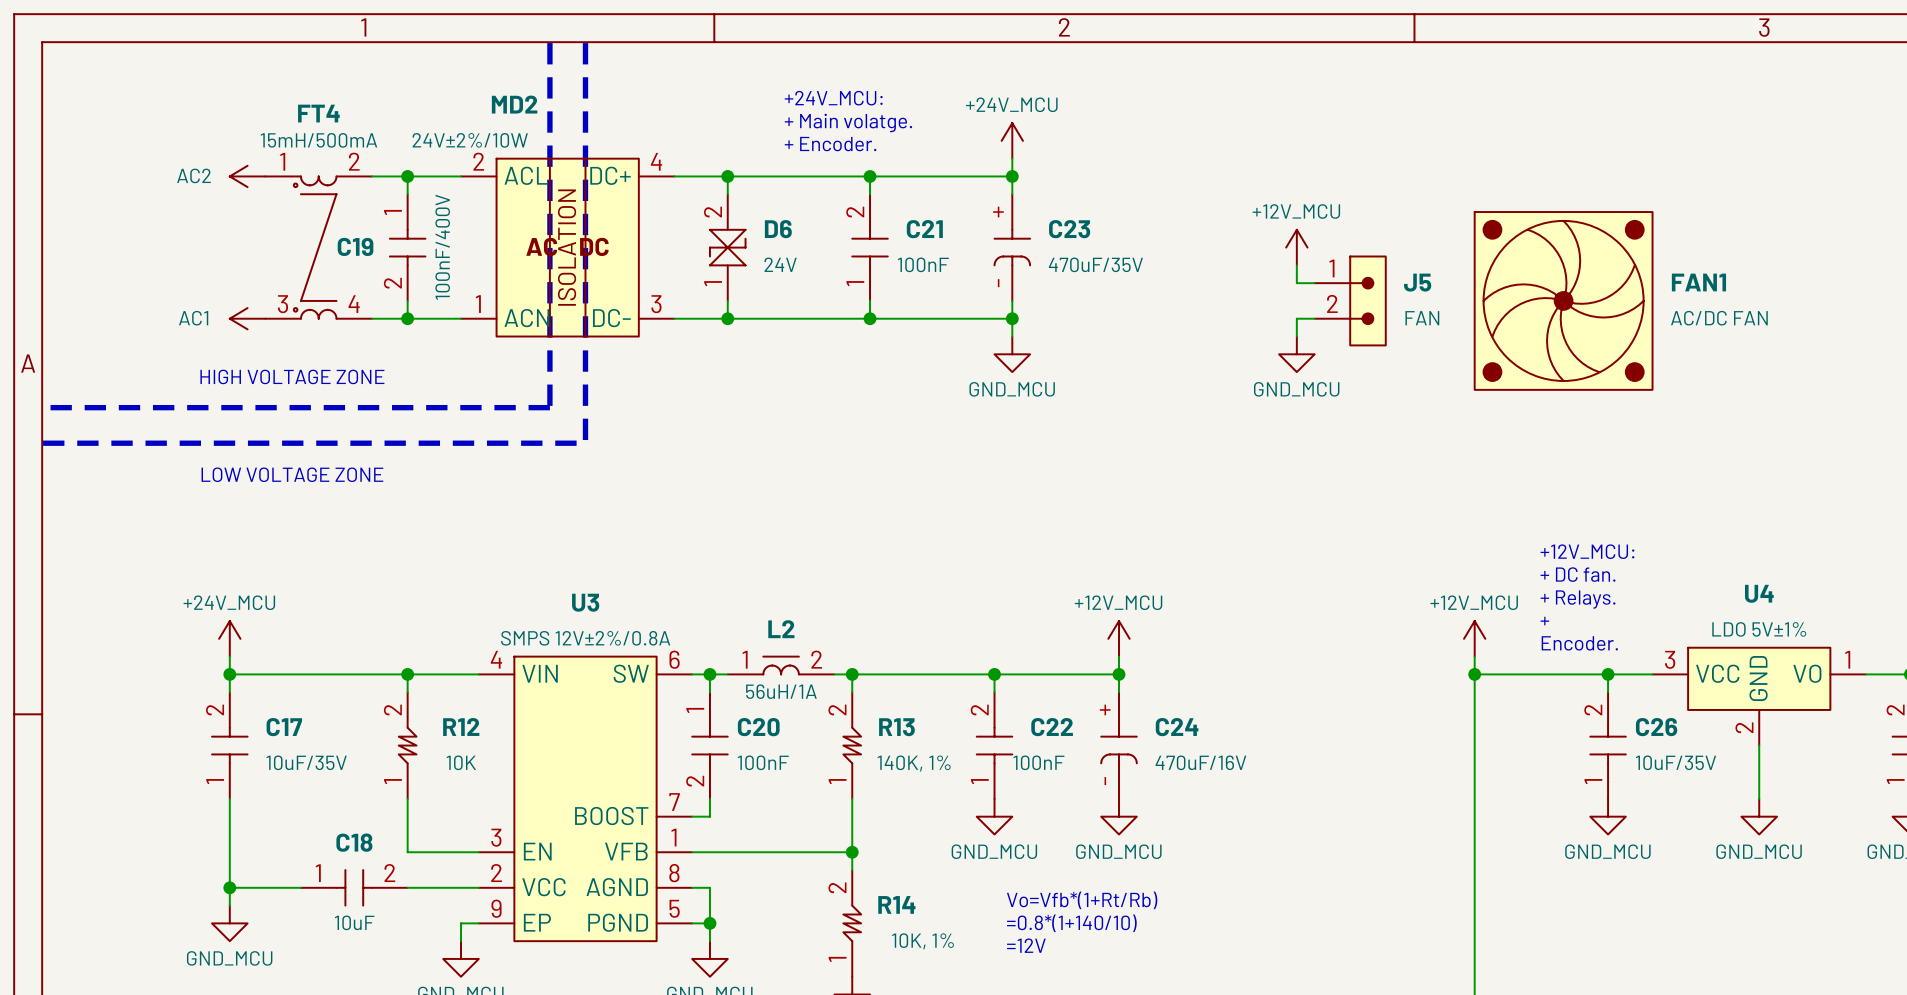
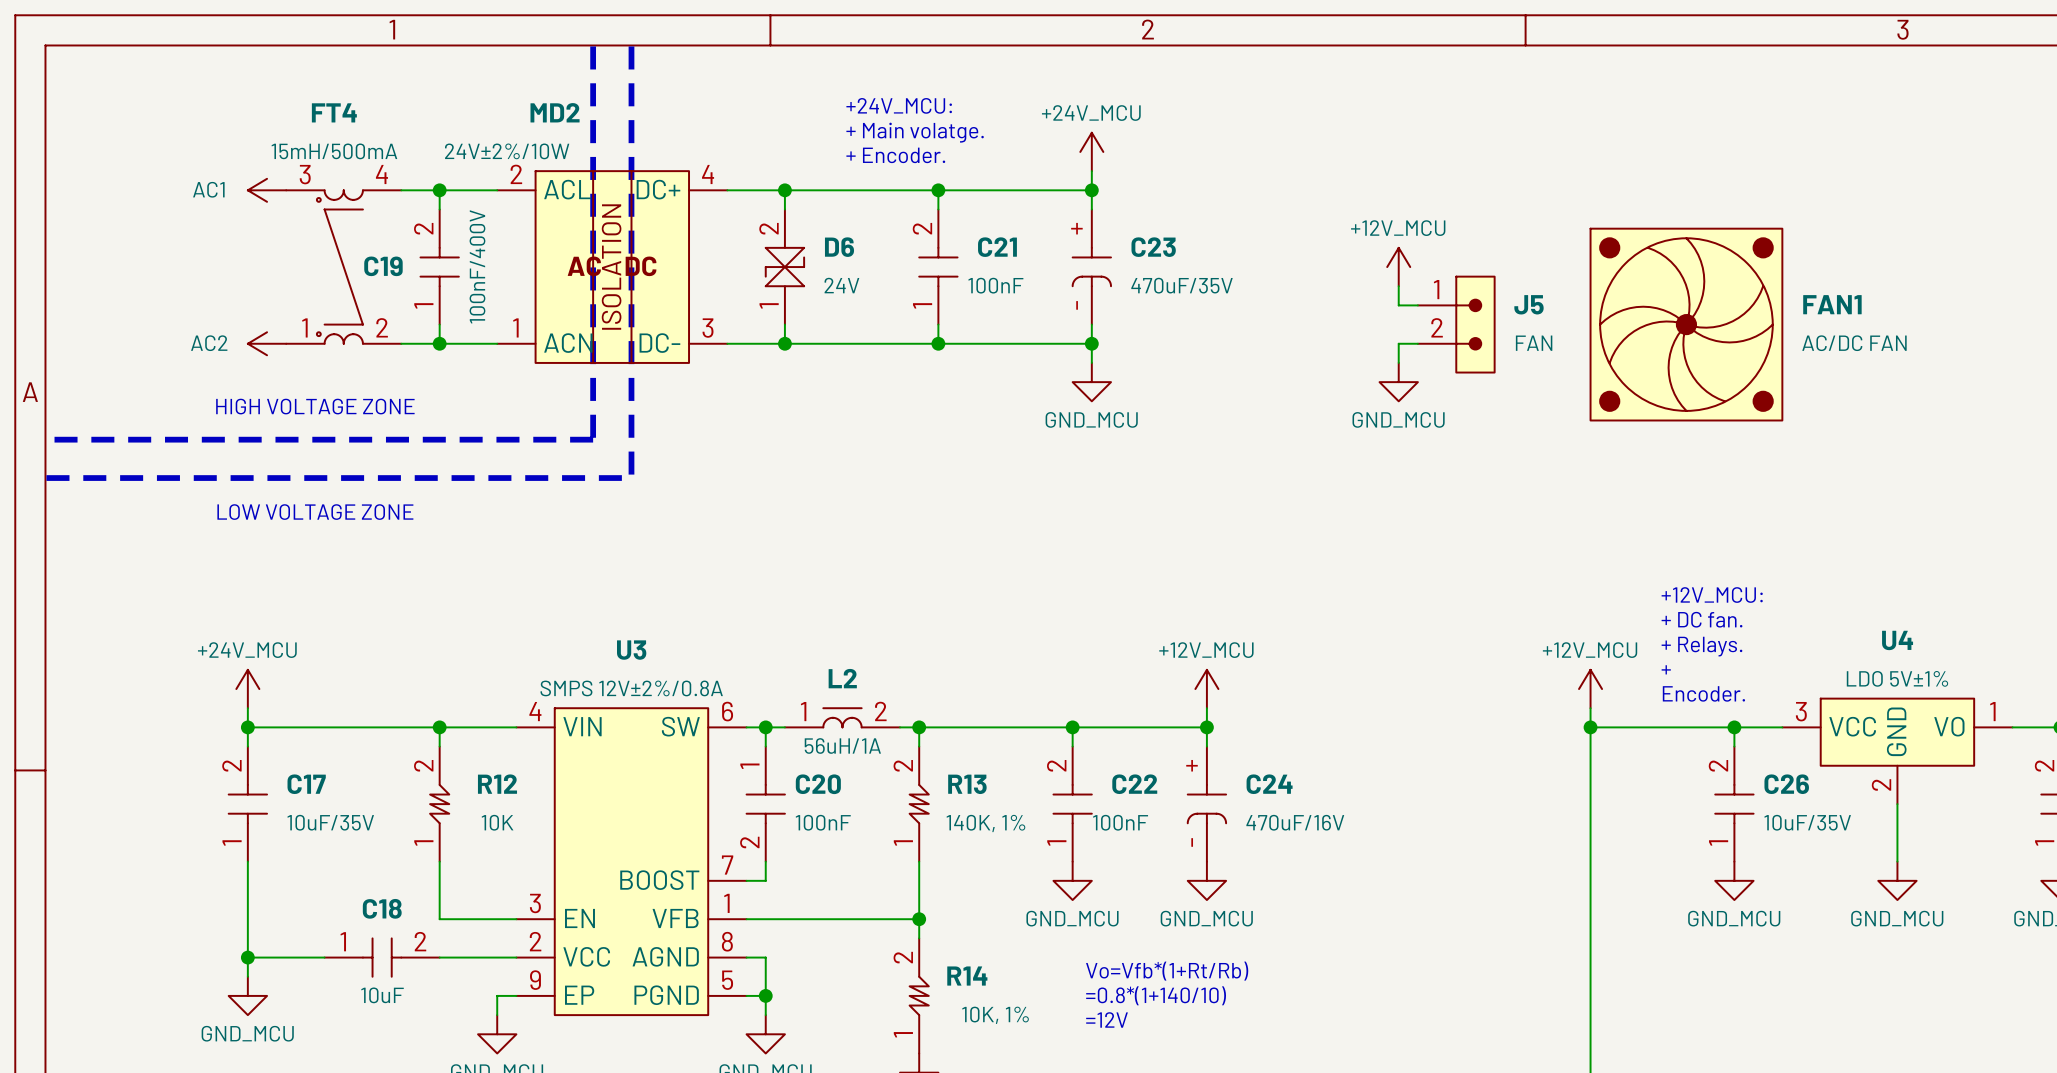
power symbol: AC2 (247, 176) -> AC1 (267, 190)
FT4 flip: as is (315, 247) -> up-down (339, 267)
C19 rotation: 0° (407, 247) -> 180° (439, 267)
power symbol: AC1 (247, 318) -> AC2 (267, 343)

